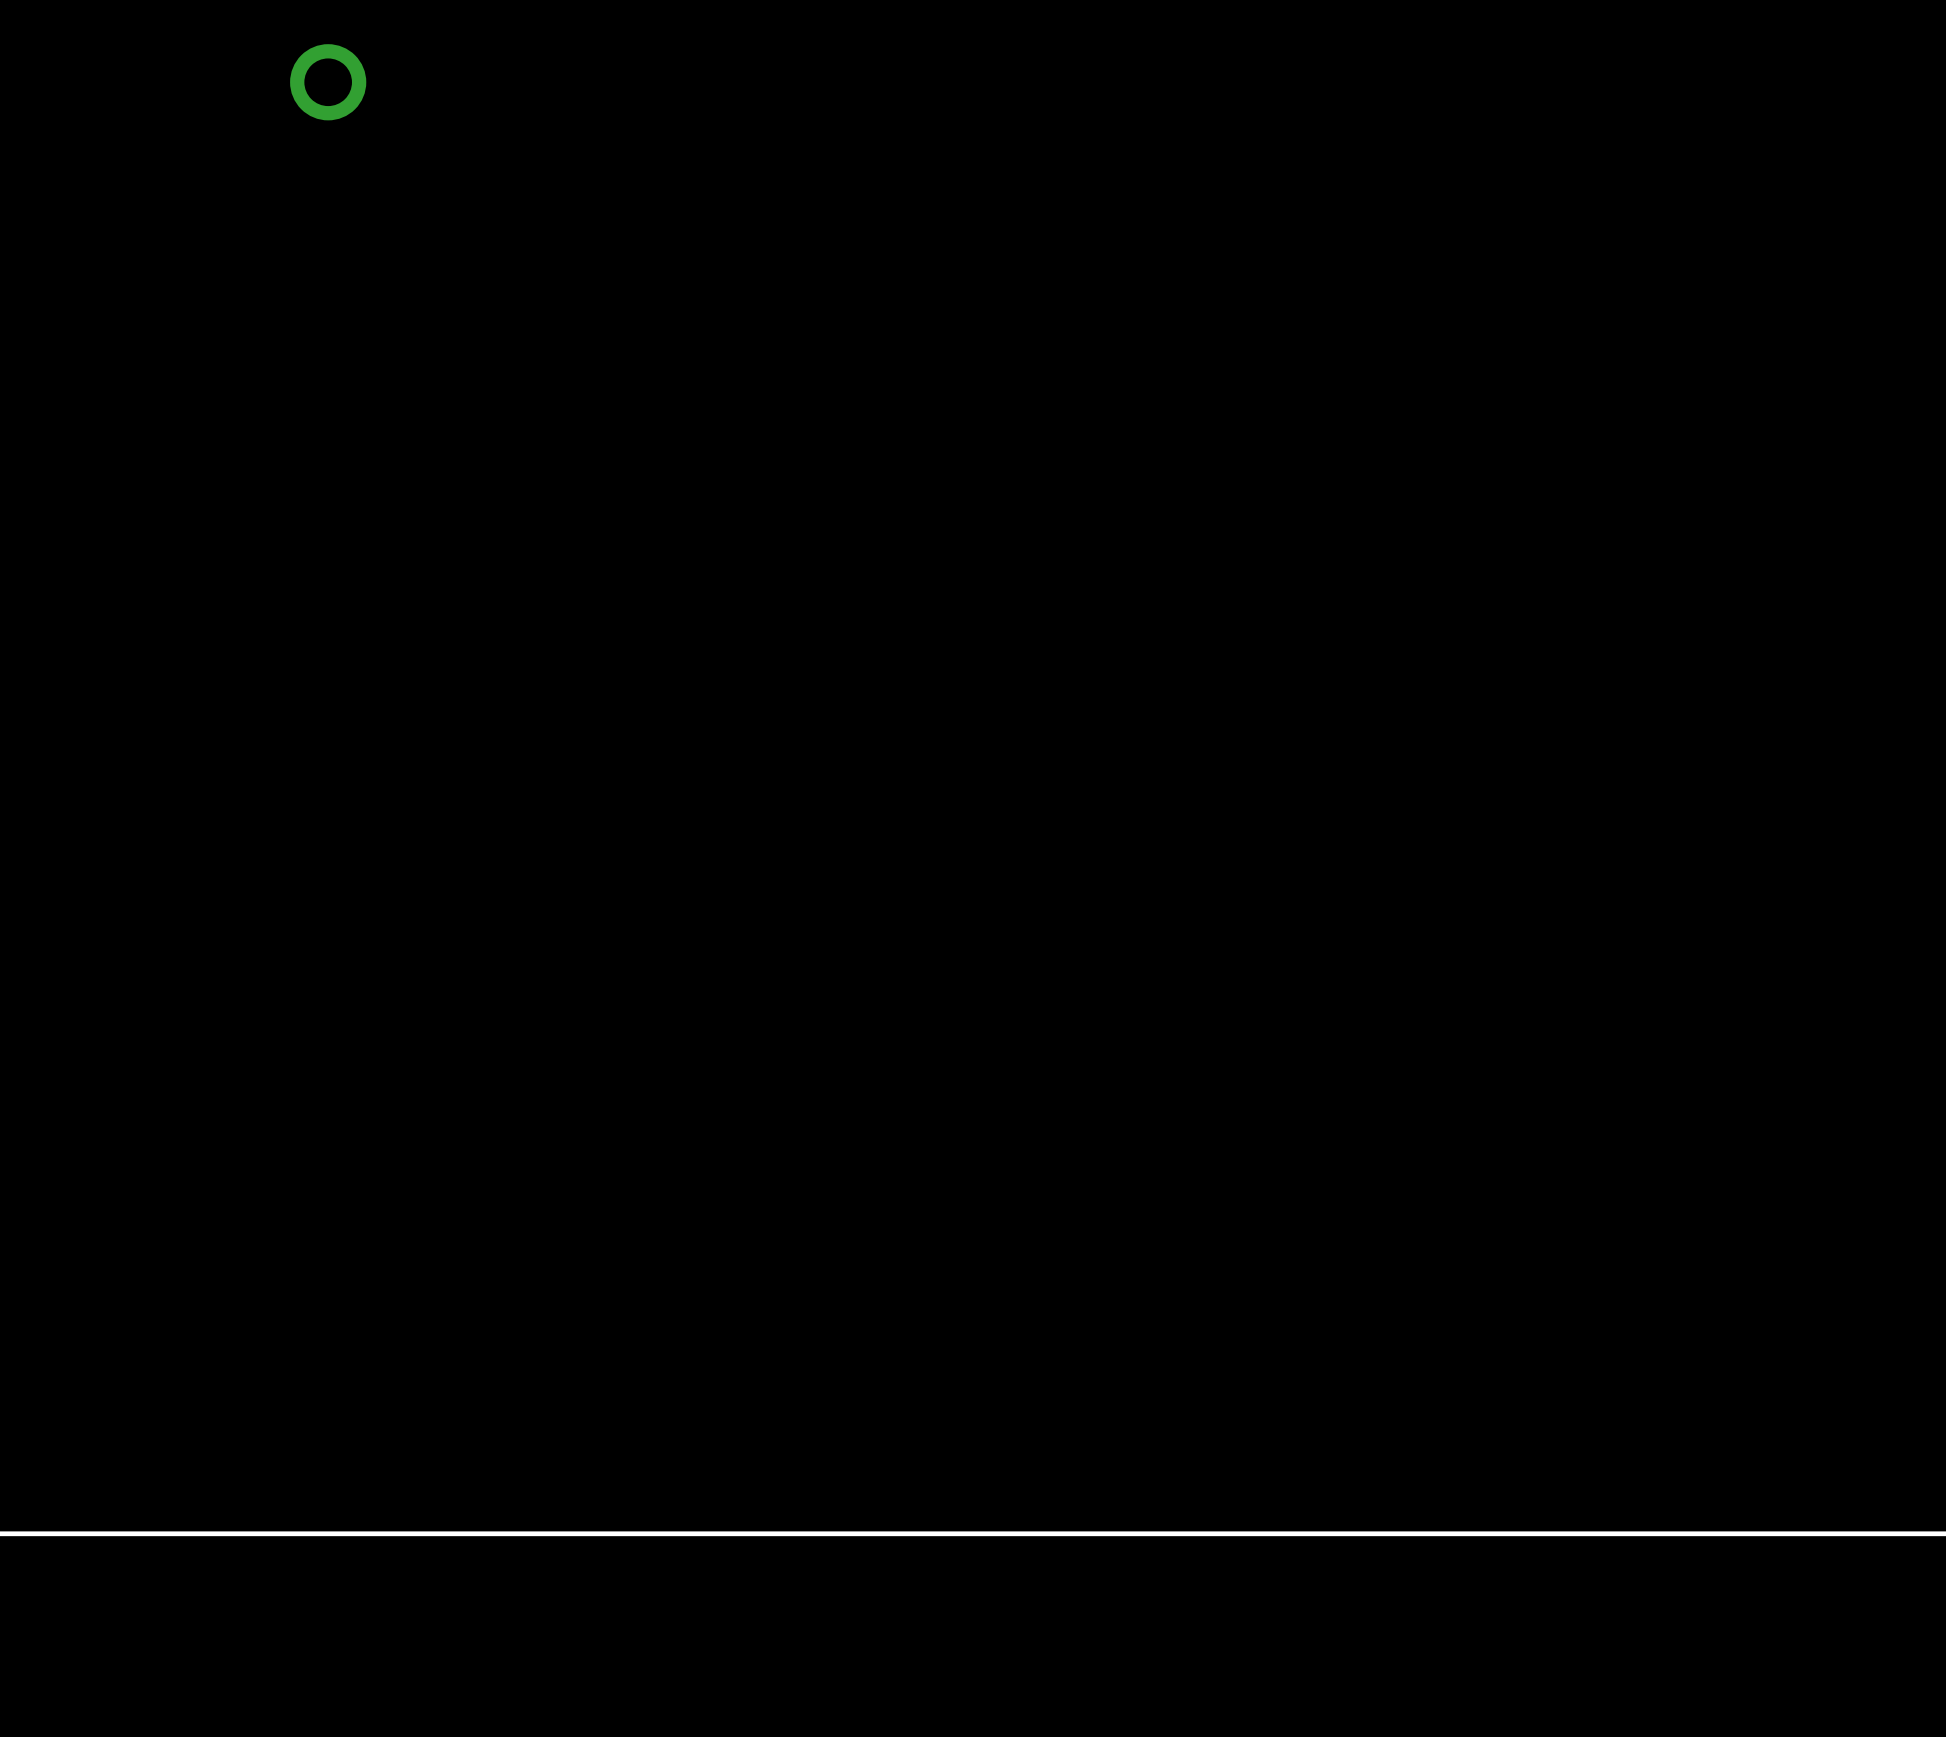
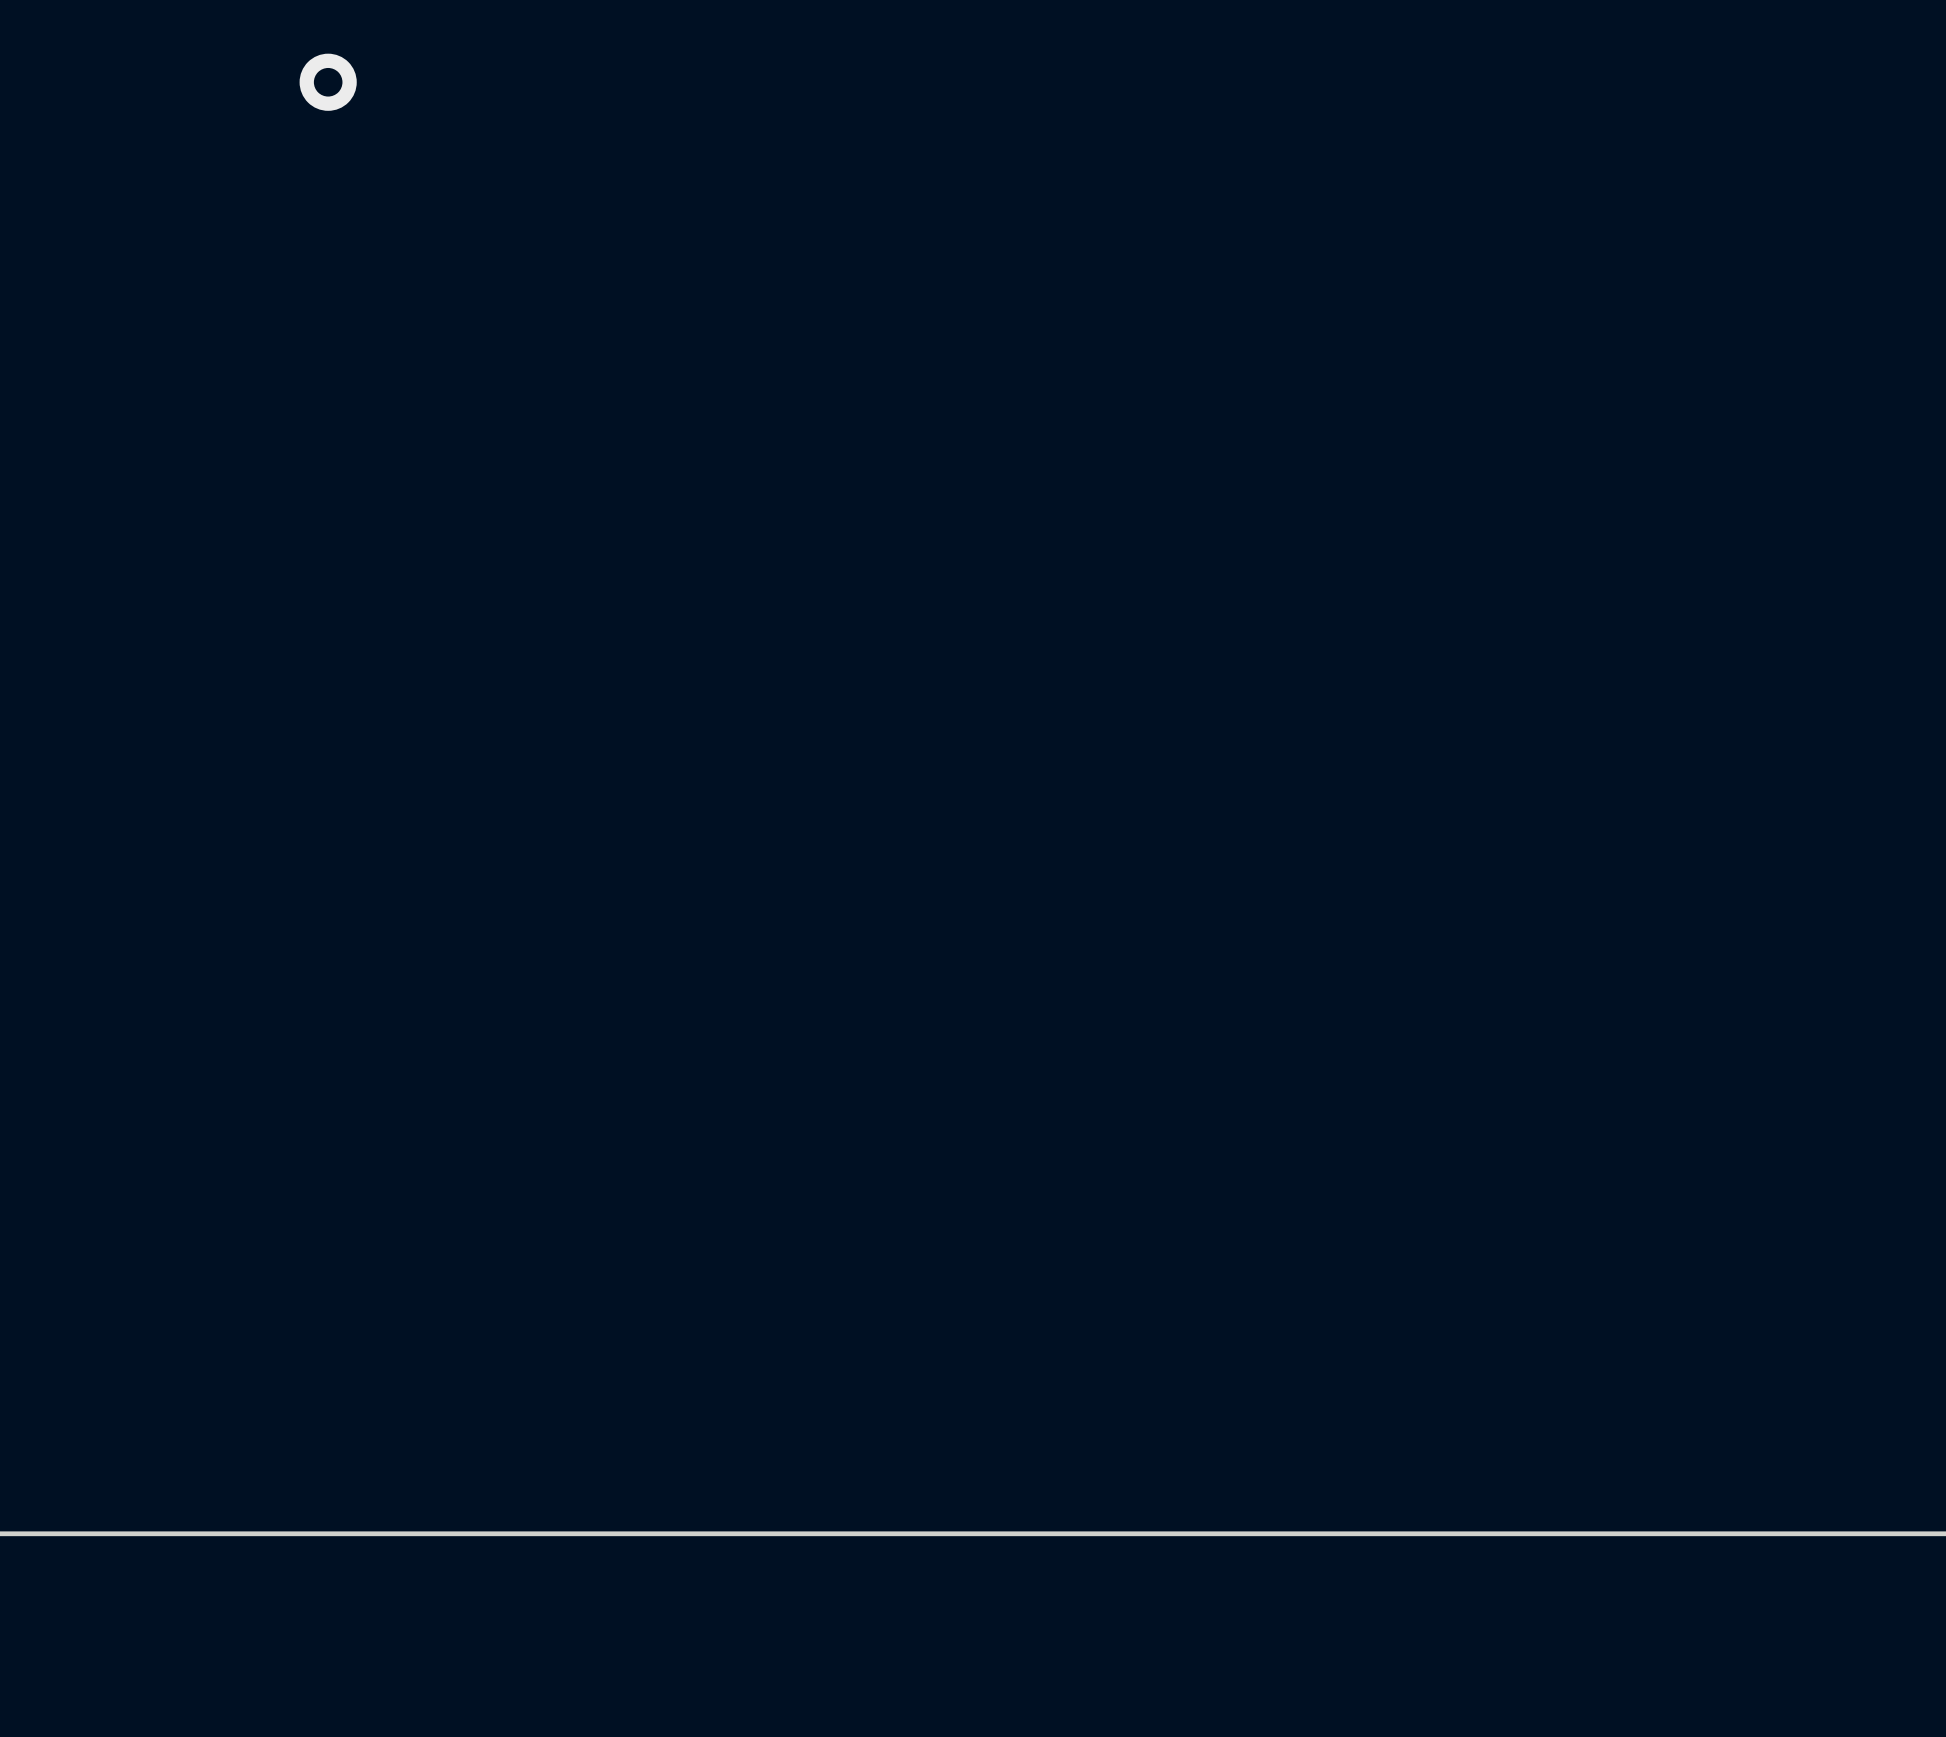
via size: [290, 44, 367, 121] -> [299, 53, 357, 111]

